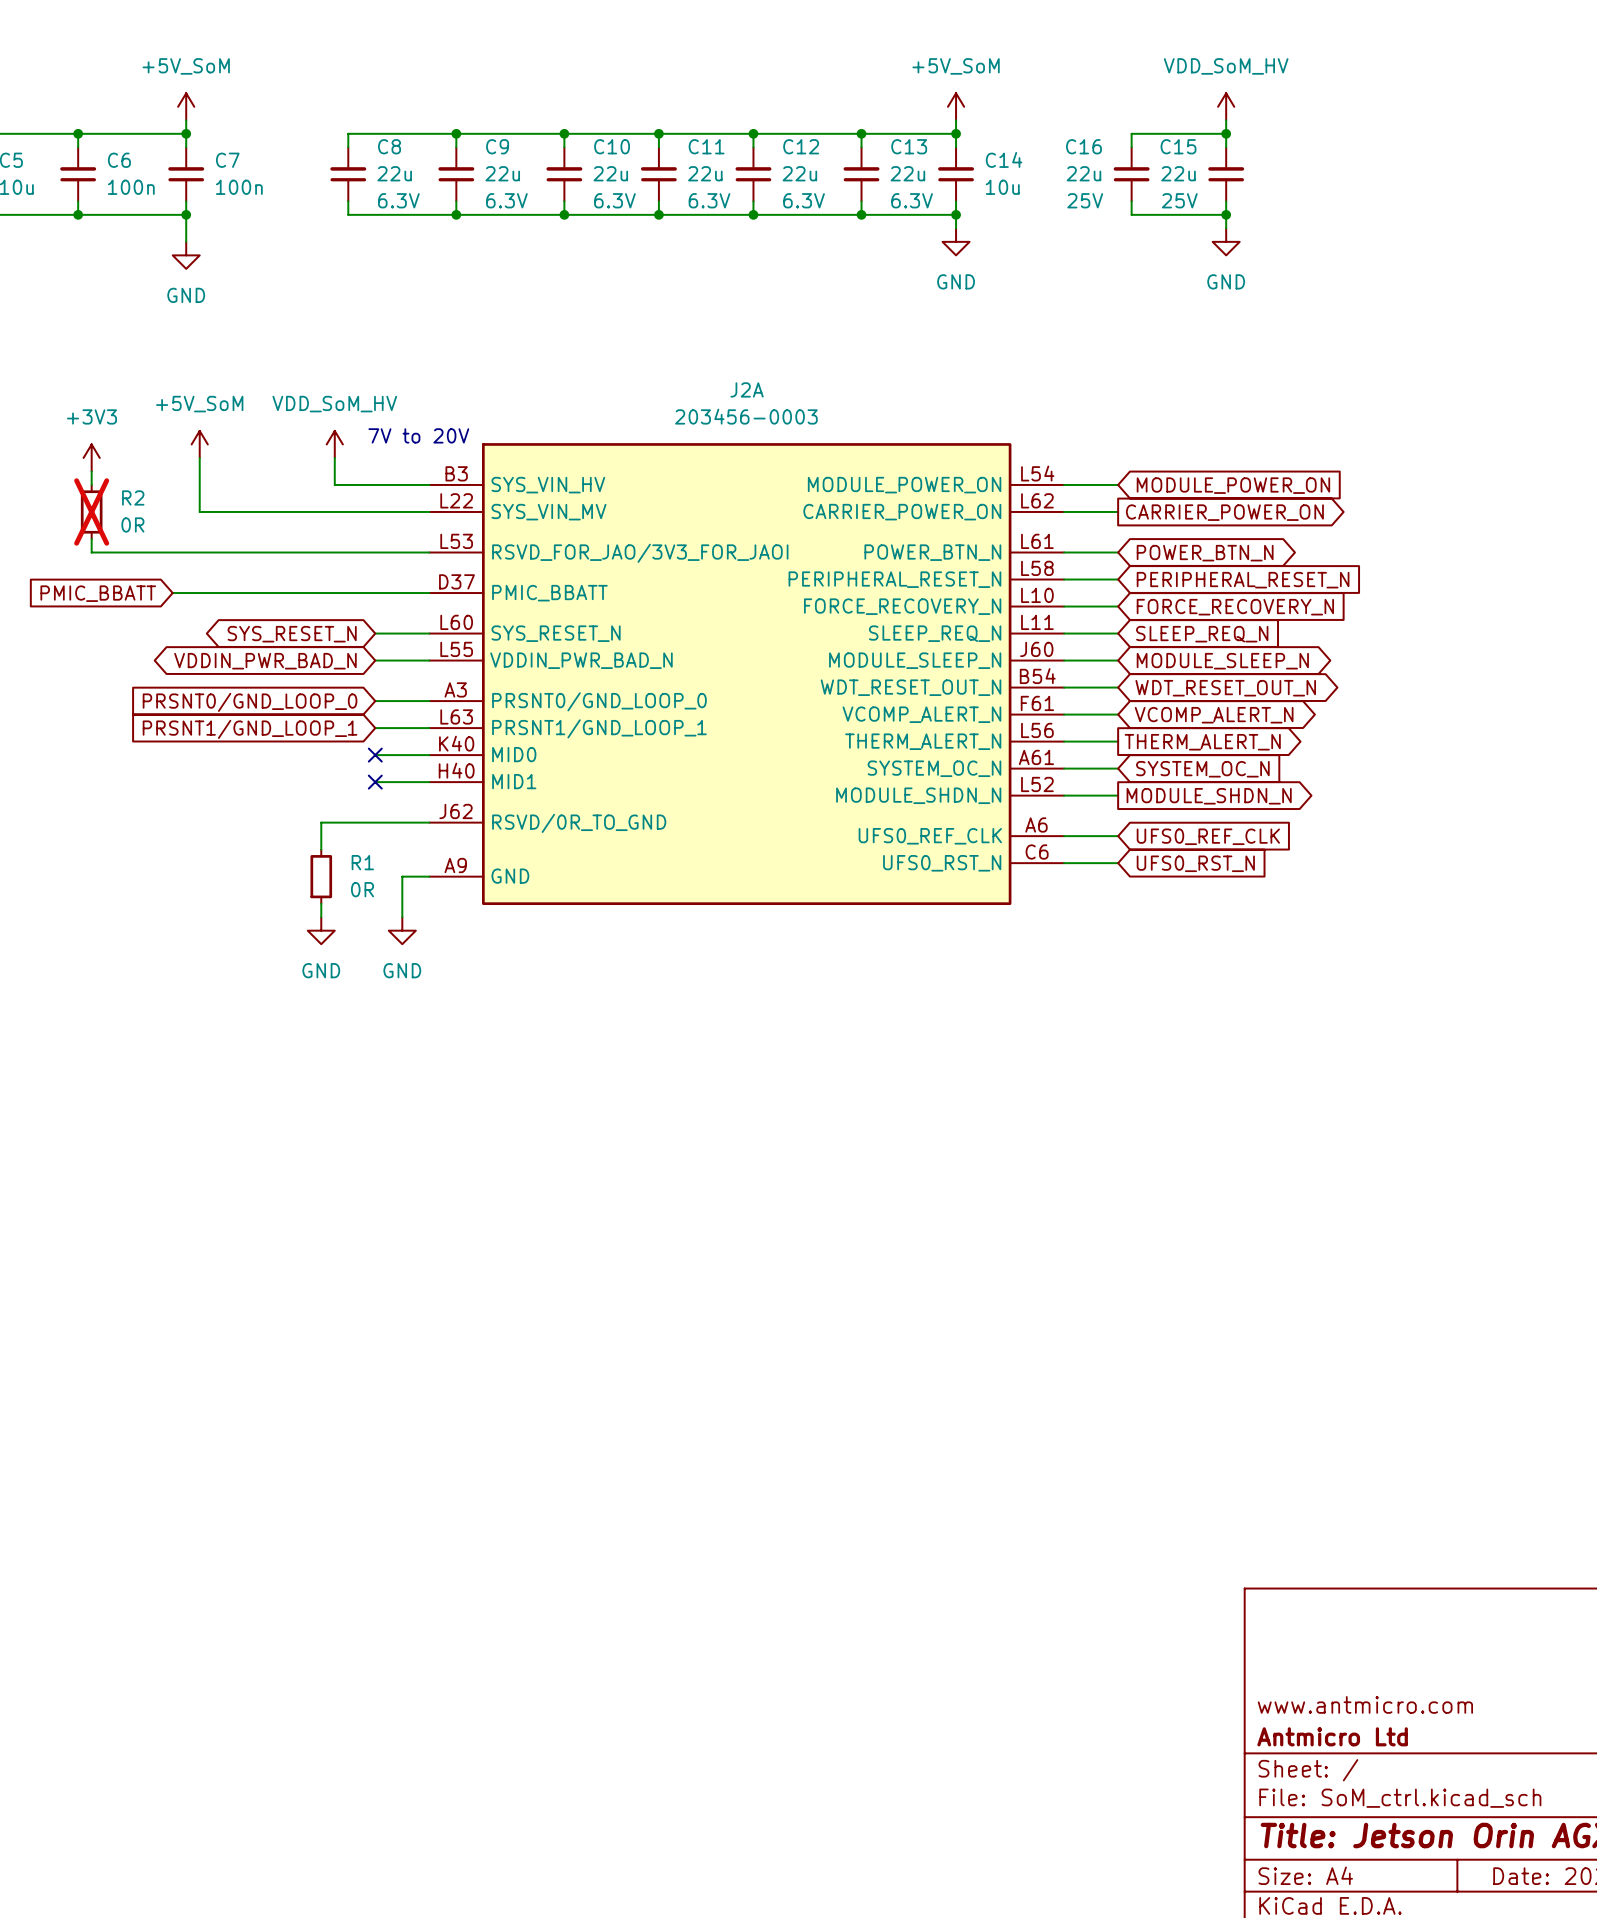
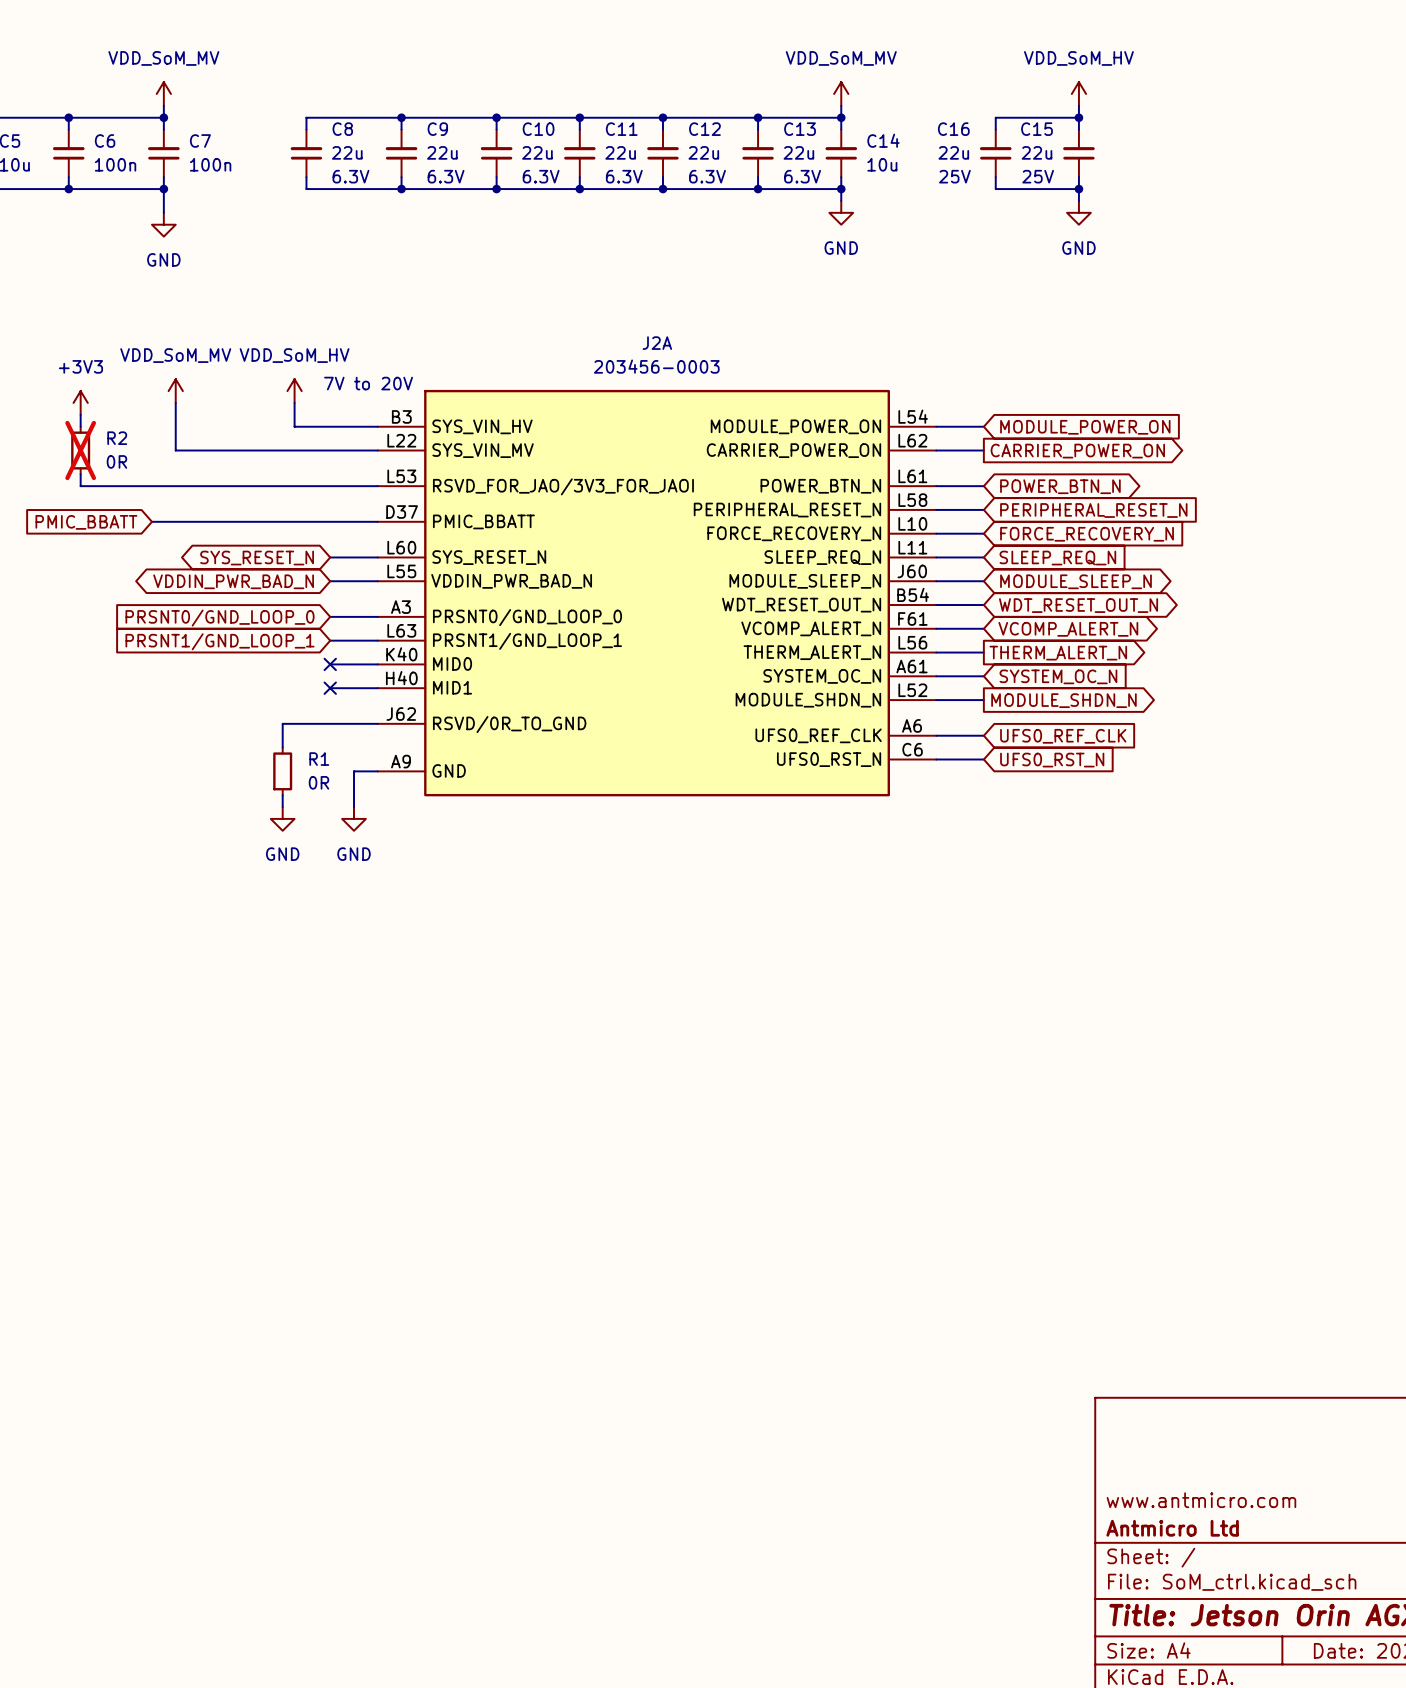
power symbol: +5V_SoM (186, 106) -> VDD_SoM_MV (163, 93)
power symbol: +5V_SoM (956, 106) -> VDD_SoM_MV (841, 93)
power symbol: +5V_SoM (199, 444) -> VDD_SoM_MV (175, 391)

